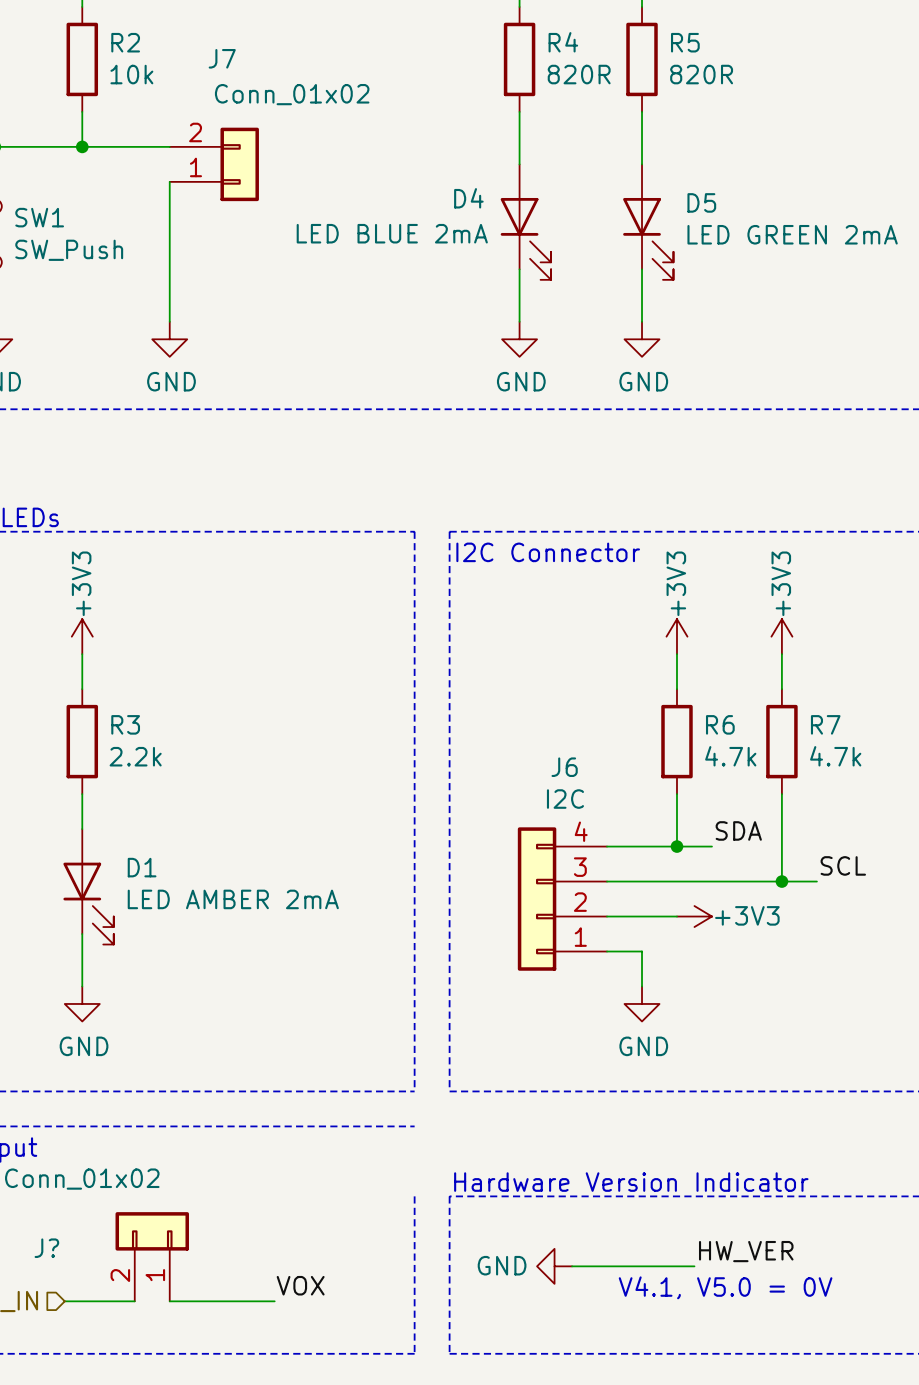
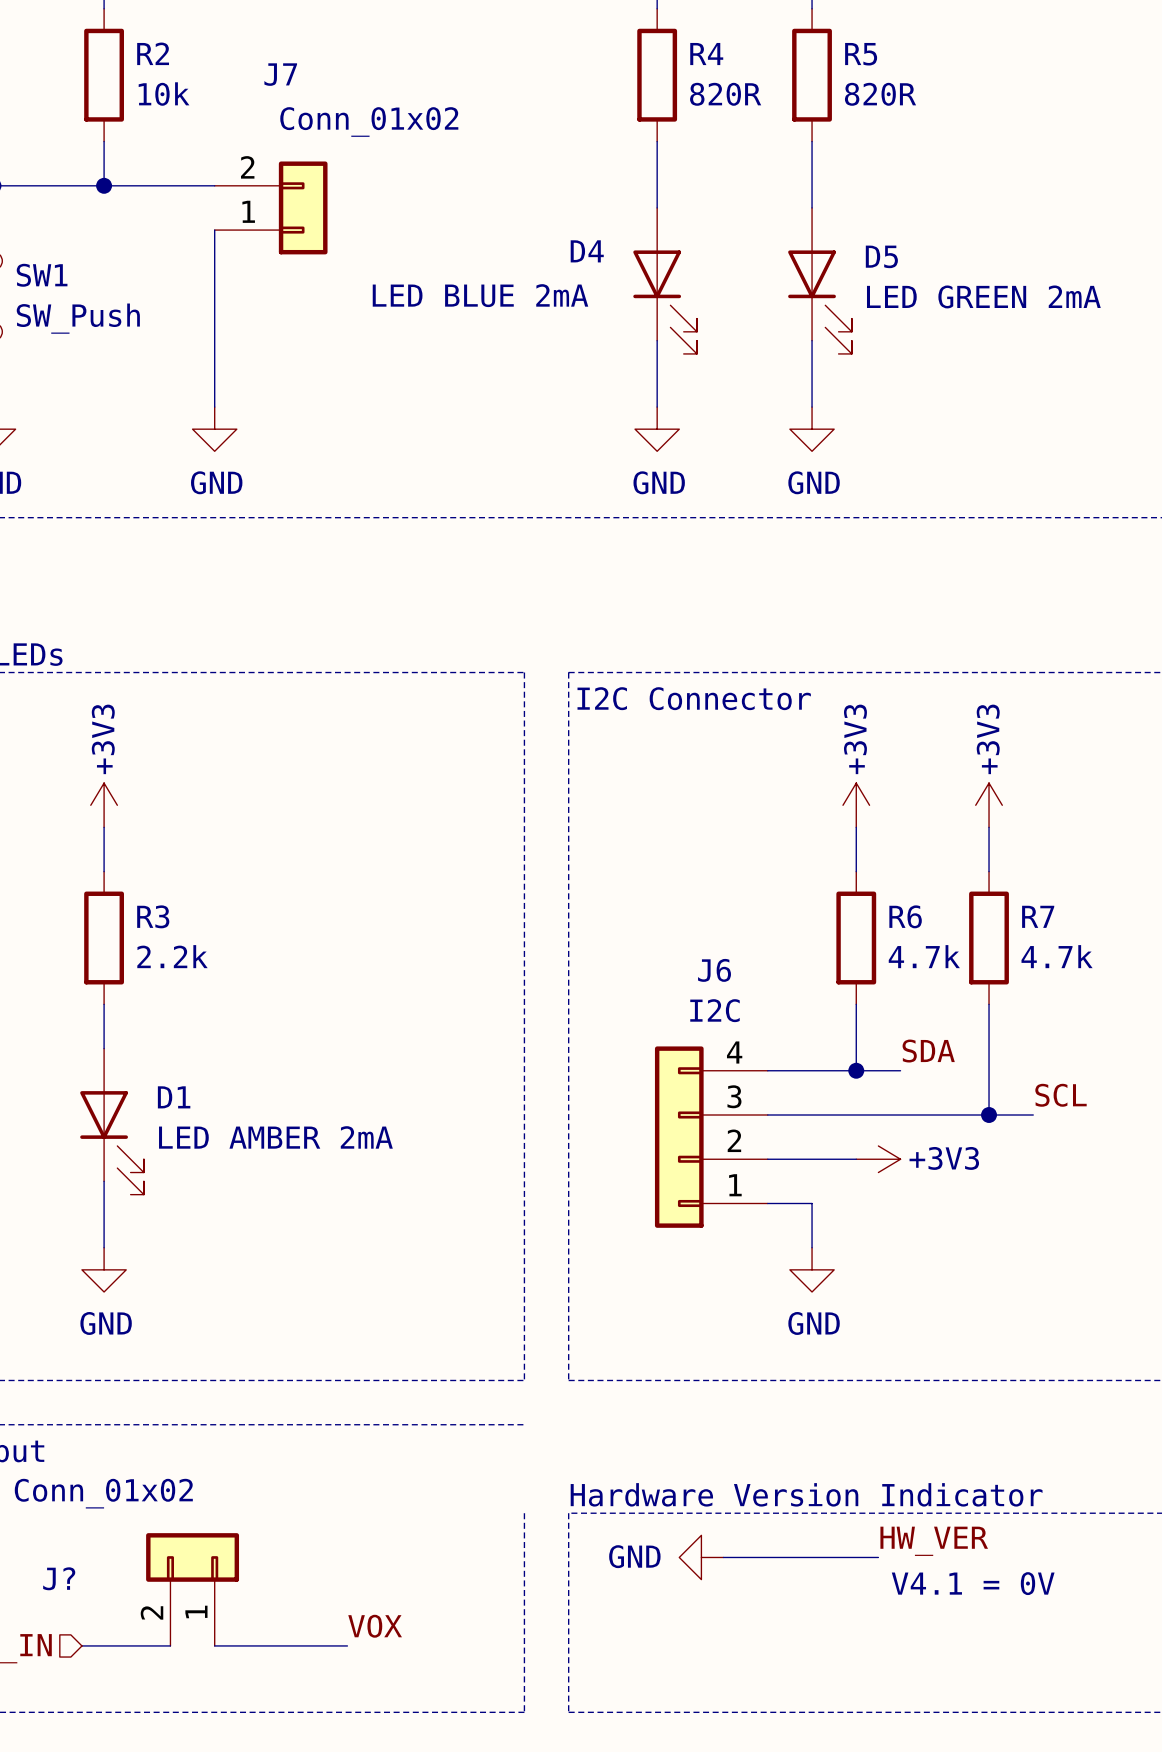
label position: HW_VER (746, 1251) -> HW_VER (934, 1541)
power symbol position: GND (554, 1266) -> GND (701, 1557)
wire: (572, 1266) (694, 1266) -> (723, 1557) (878, 1557)
text: V4.1, V5.0 = 0V (725, 1287) -> V4.1 = 0V (973, 1583)

